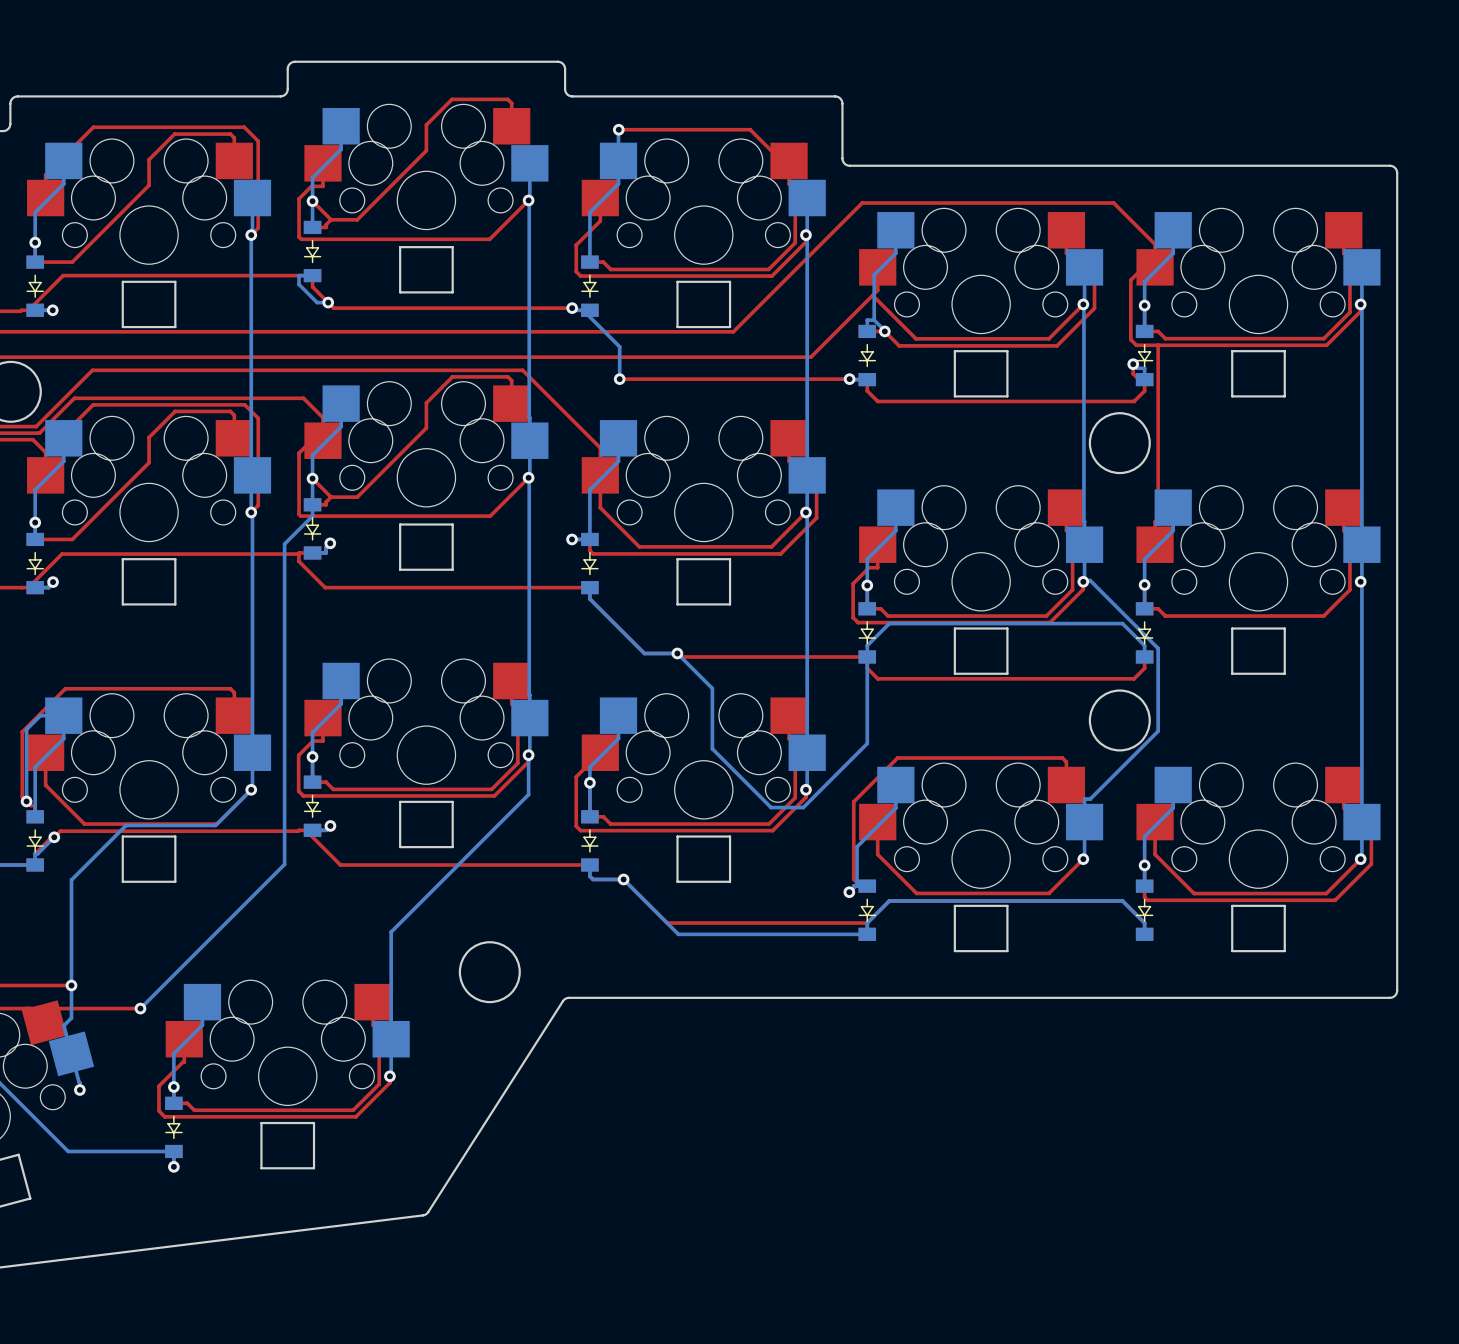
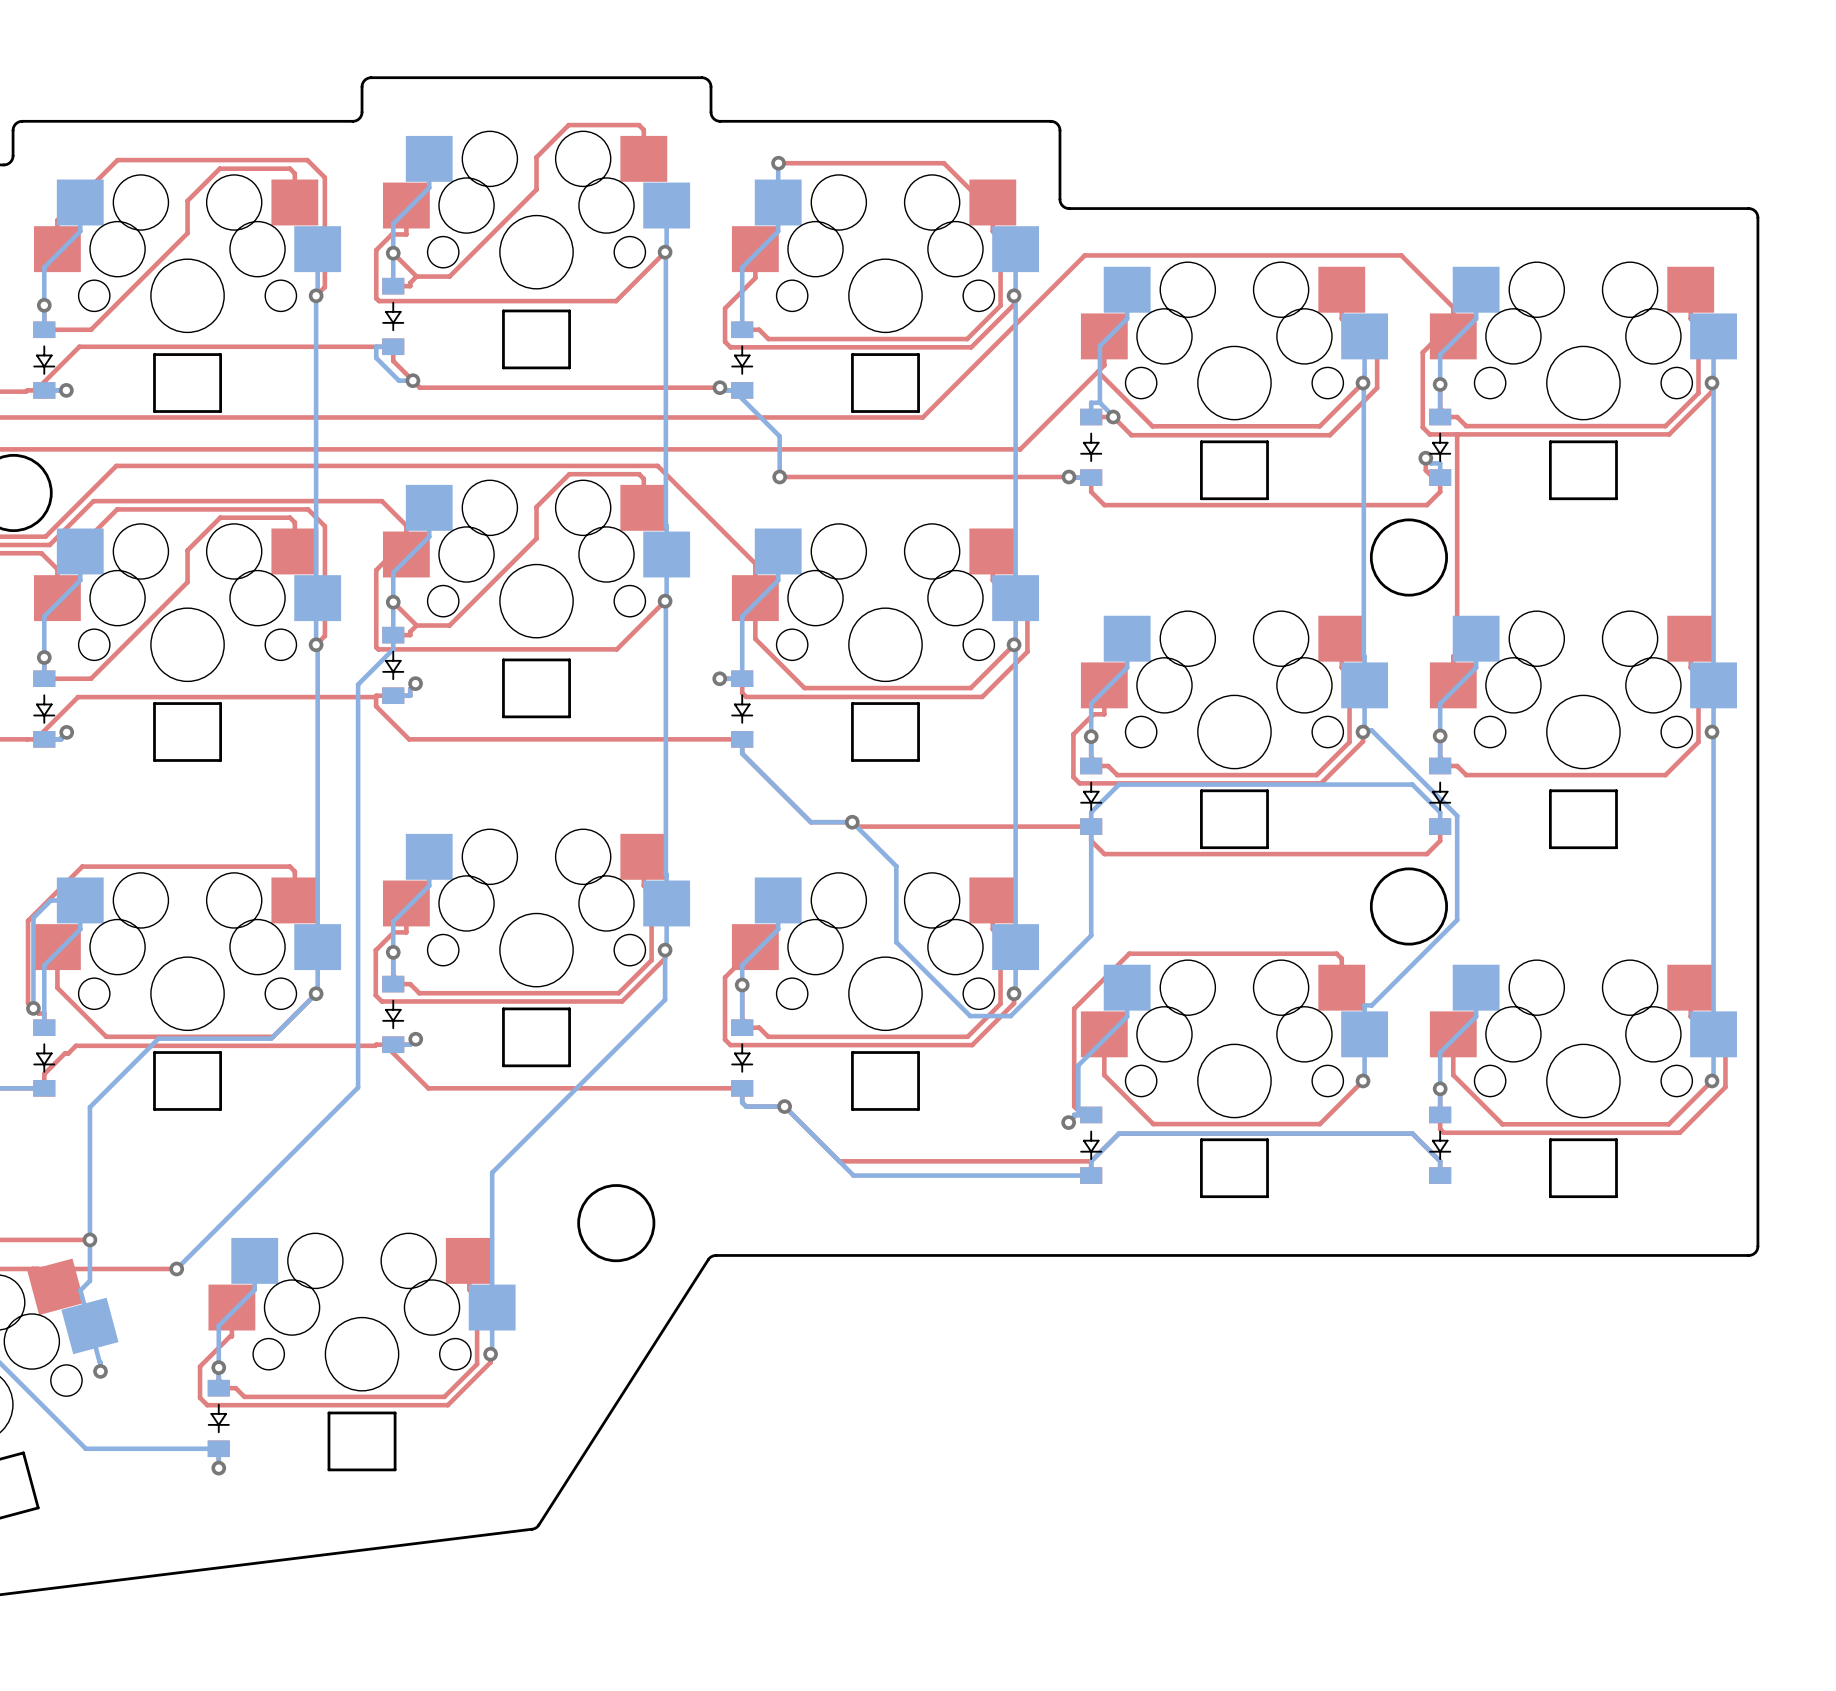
bottom track: (54, 837) (37, 853) (35, 853) (35, 865) -> none
via: (54, 837) -> none

